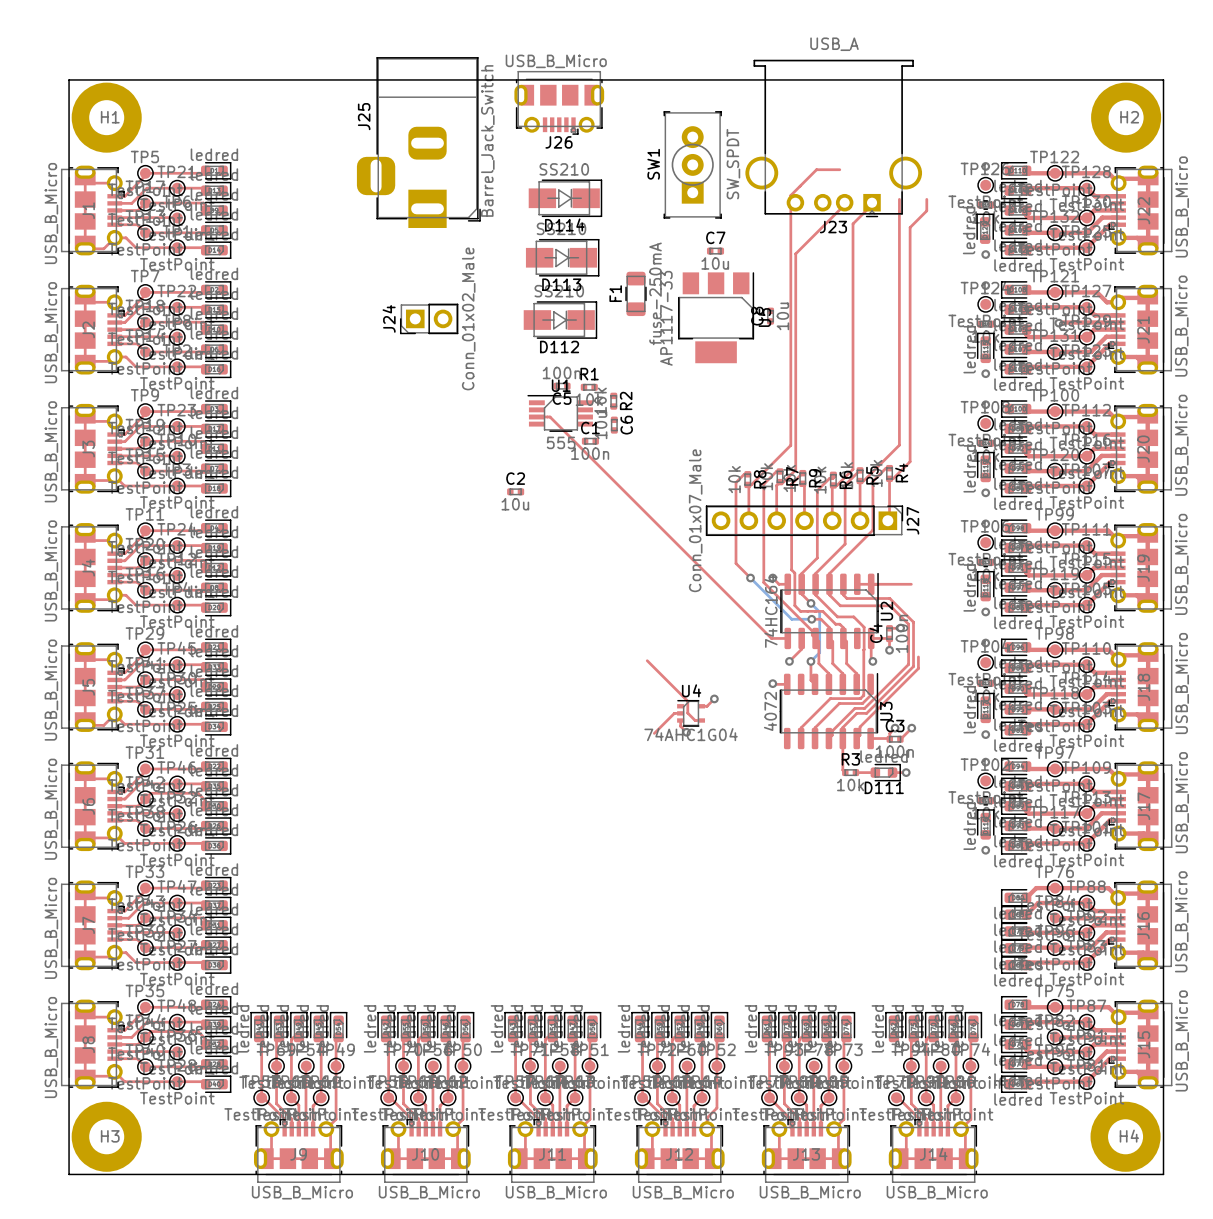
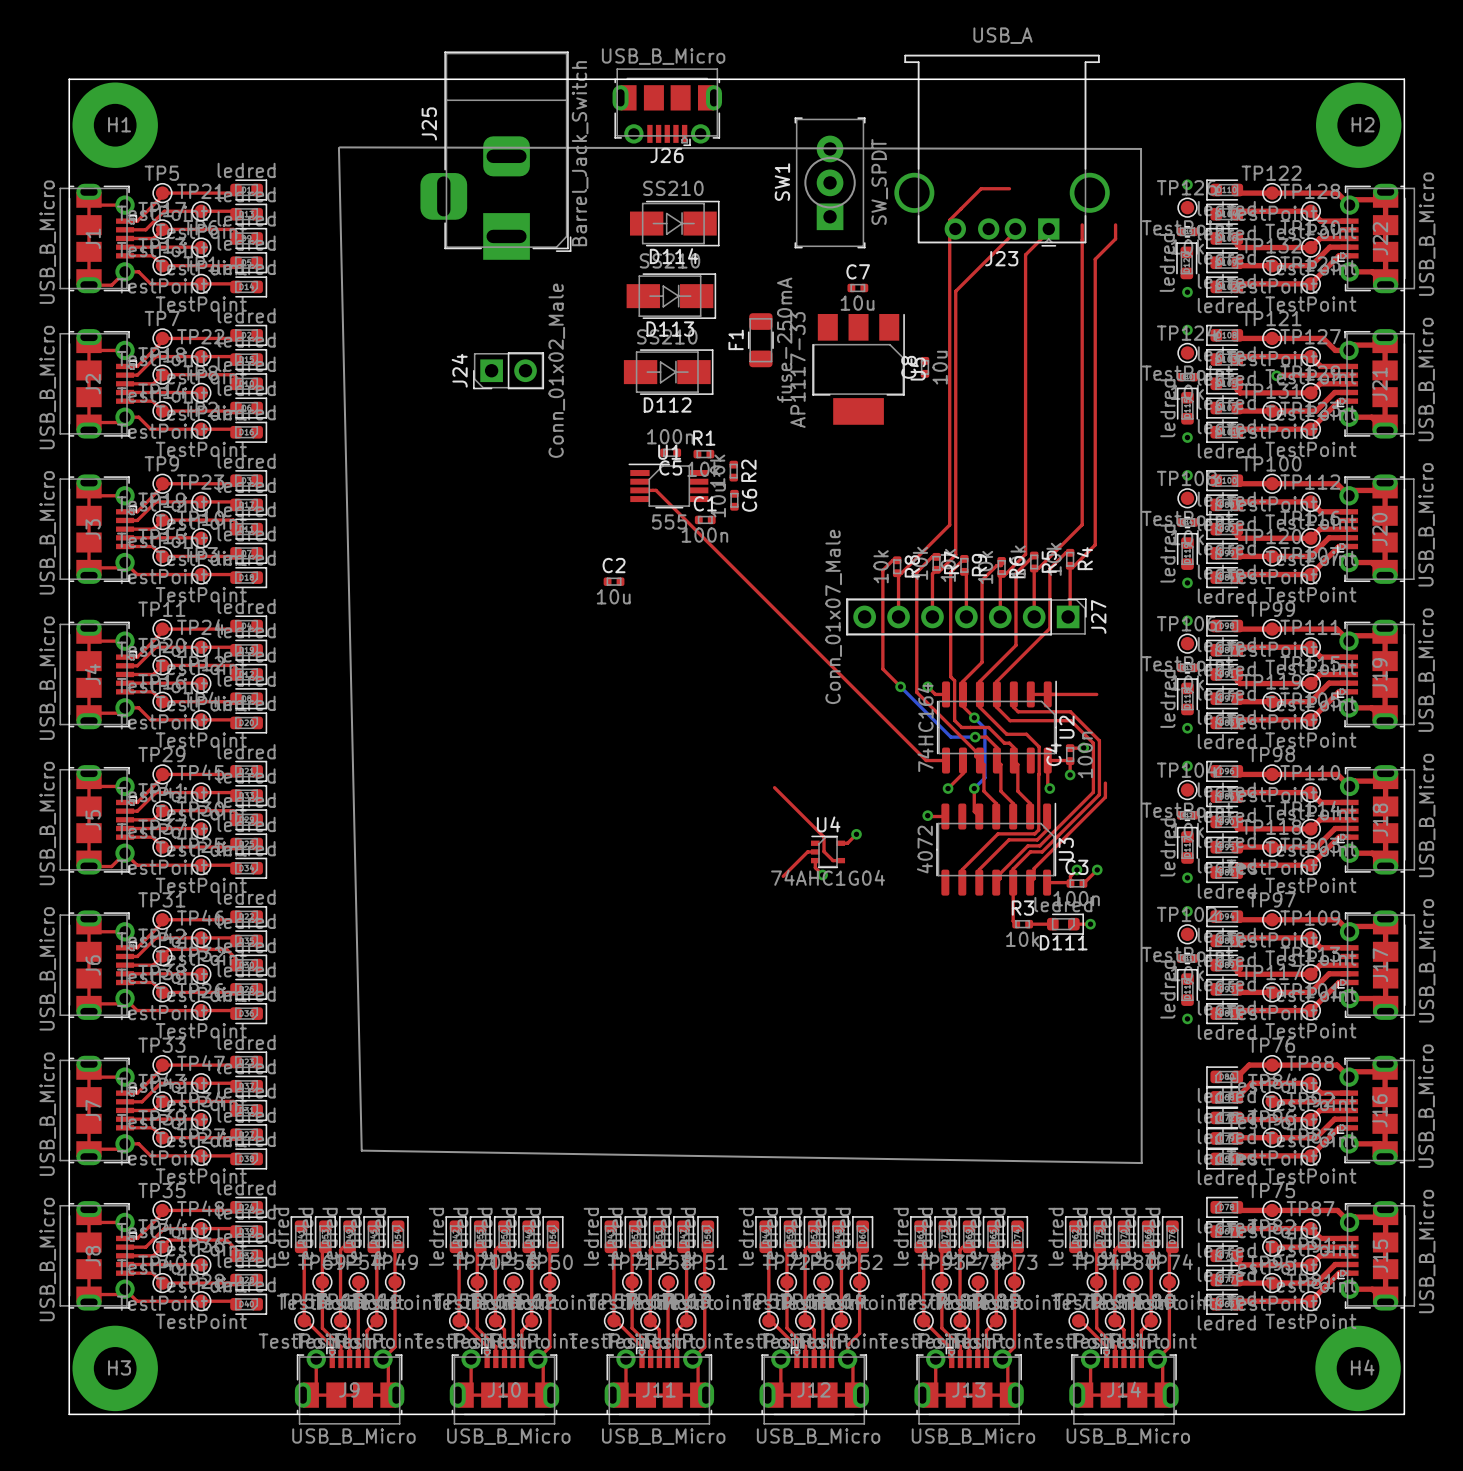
line: none -> (339, 147) (1141, 148) (1141, 1163) (361, 1150) (338, 148)

